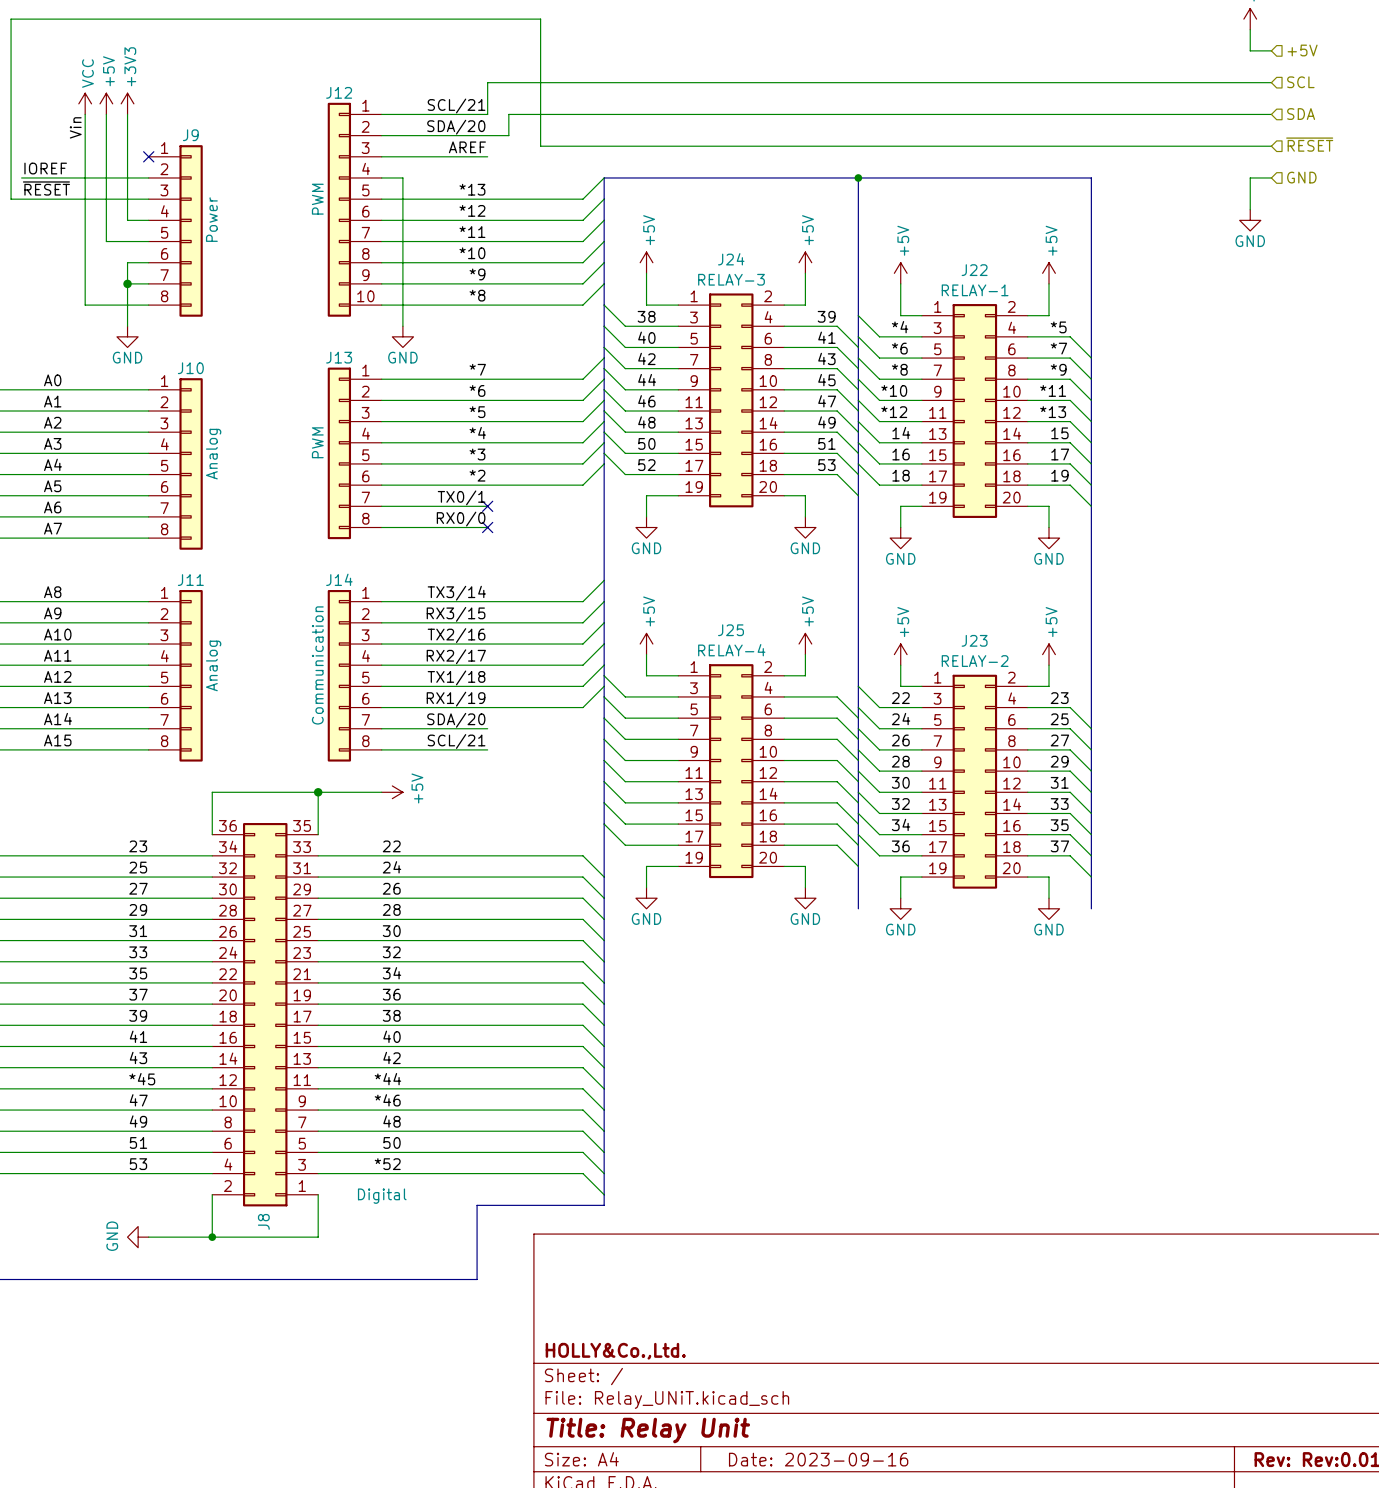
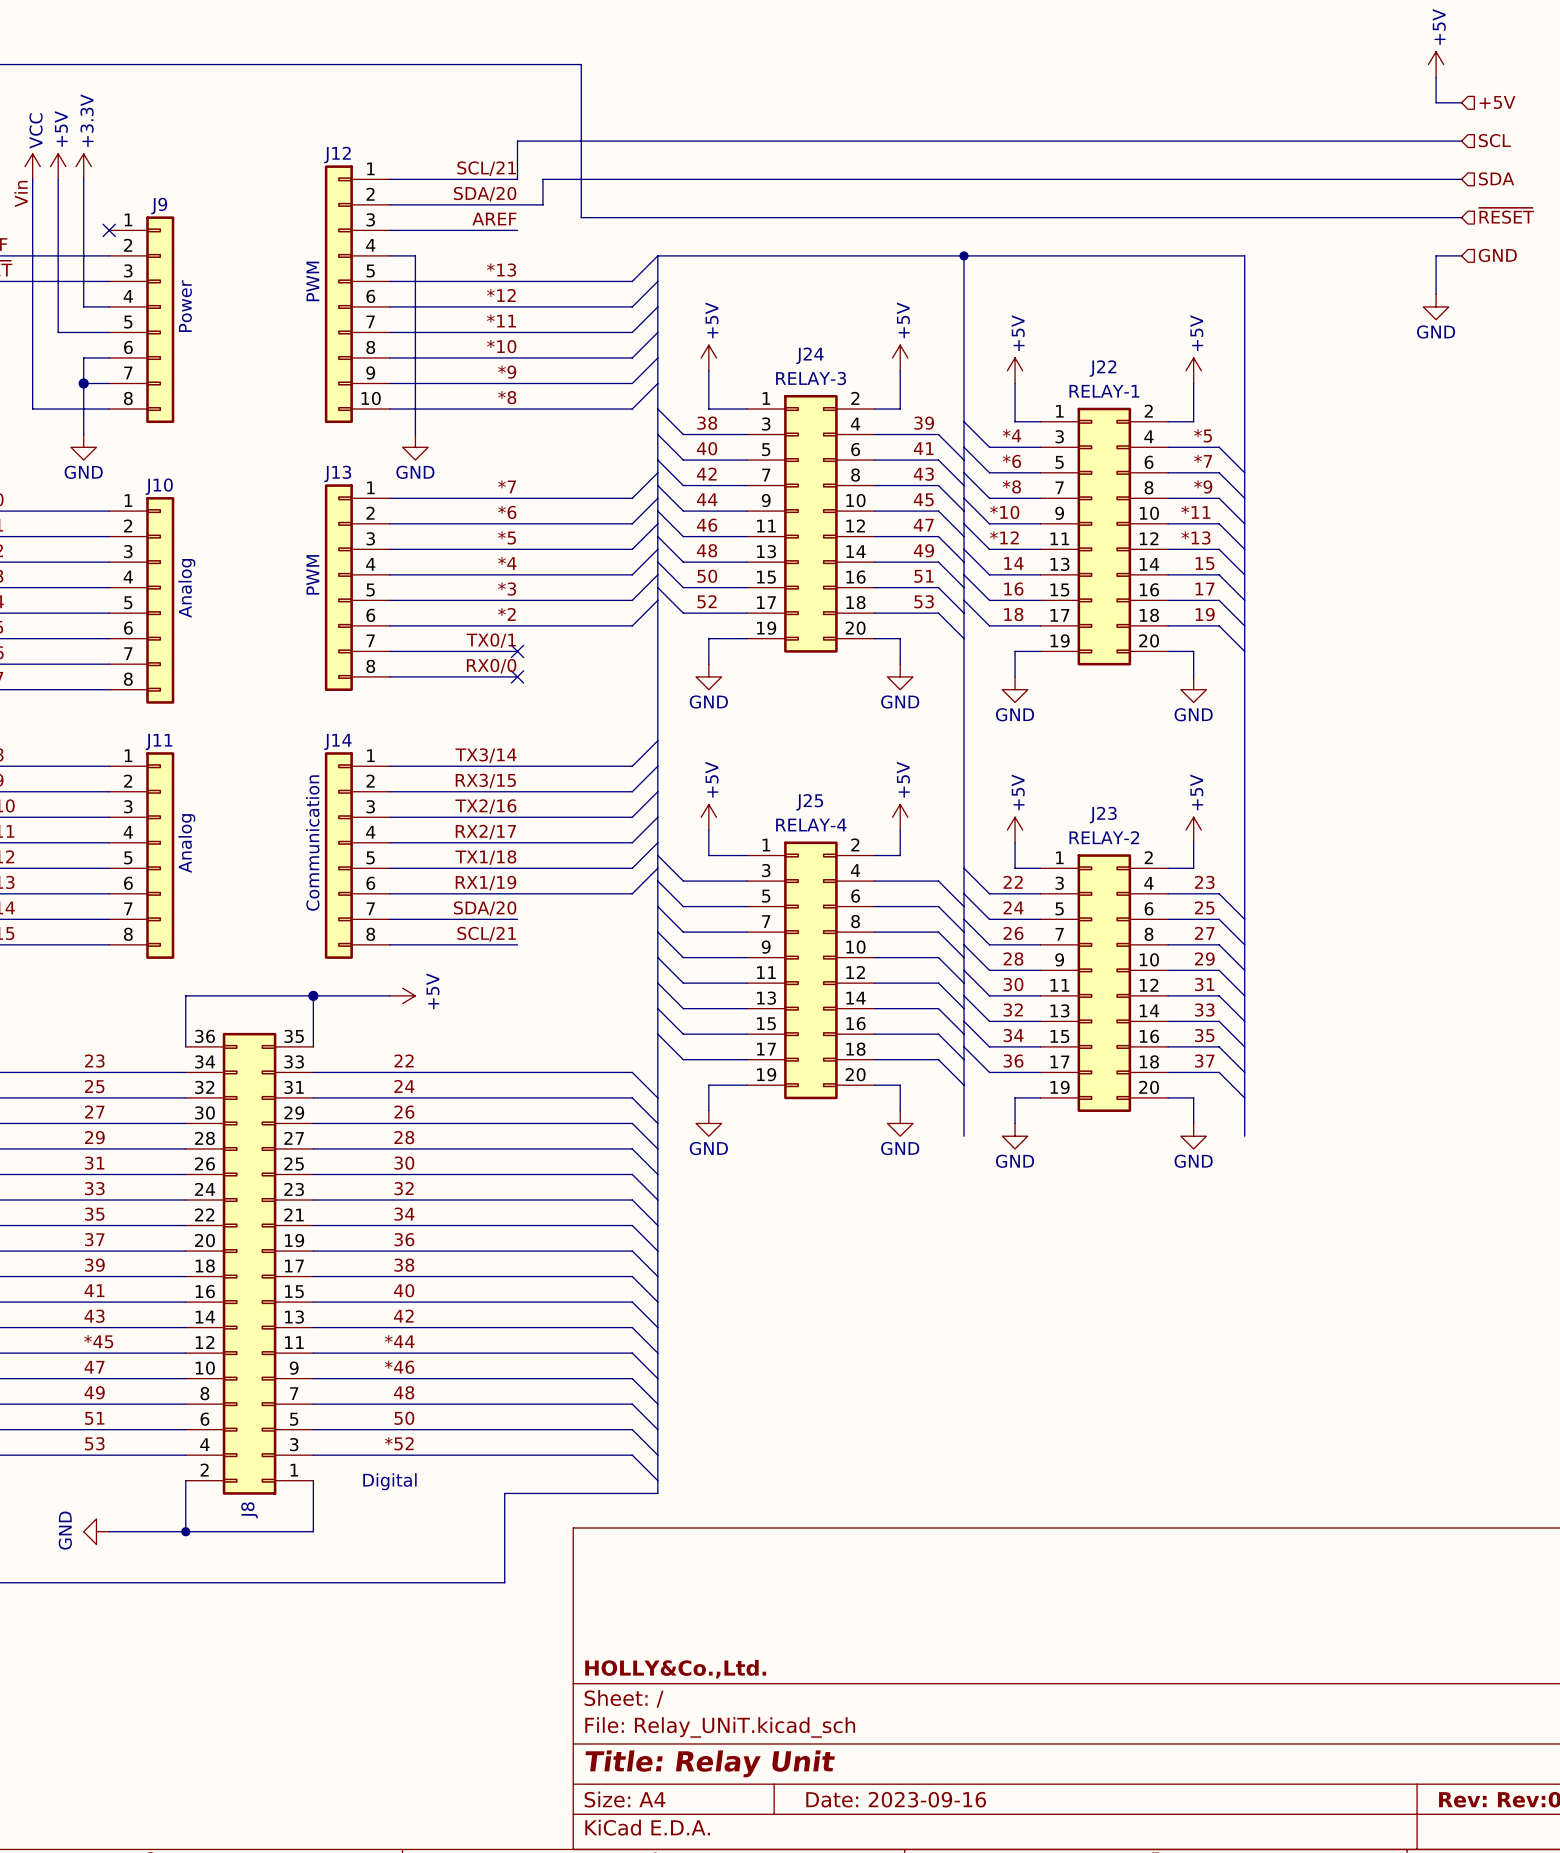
power symbol: +3V3 (127, 103) -> +3.3V (83, 166)

